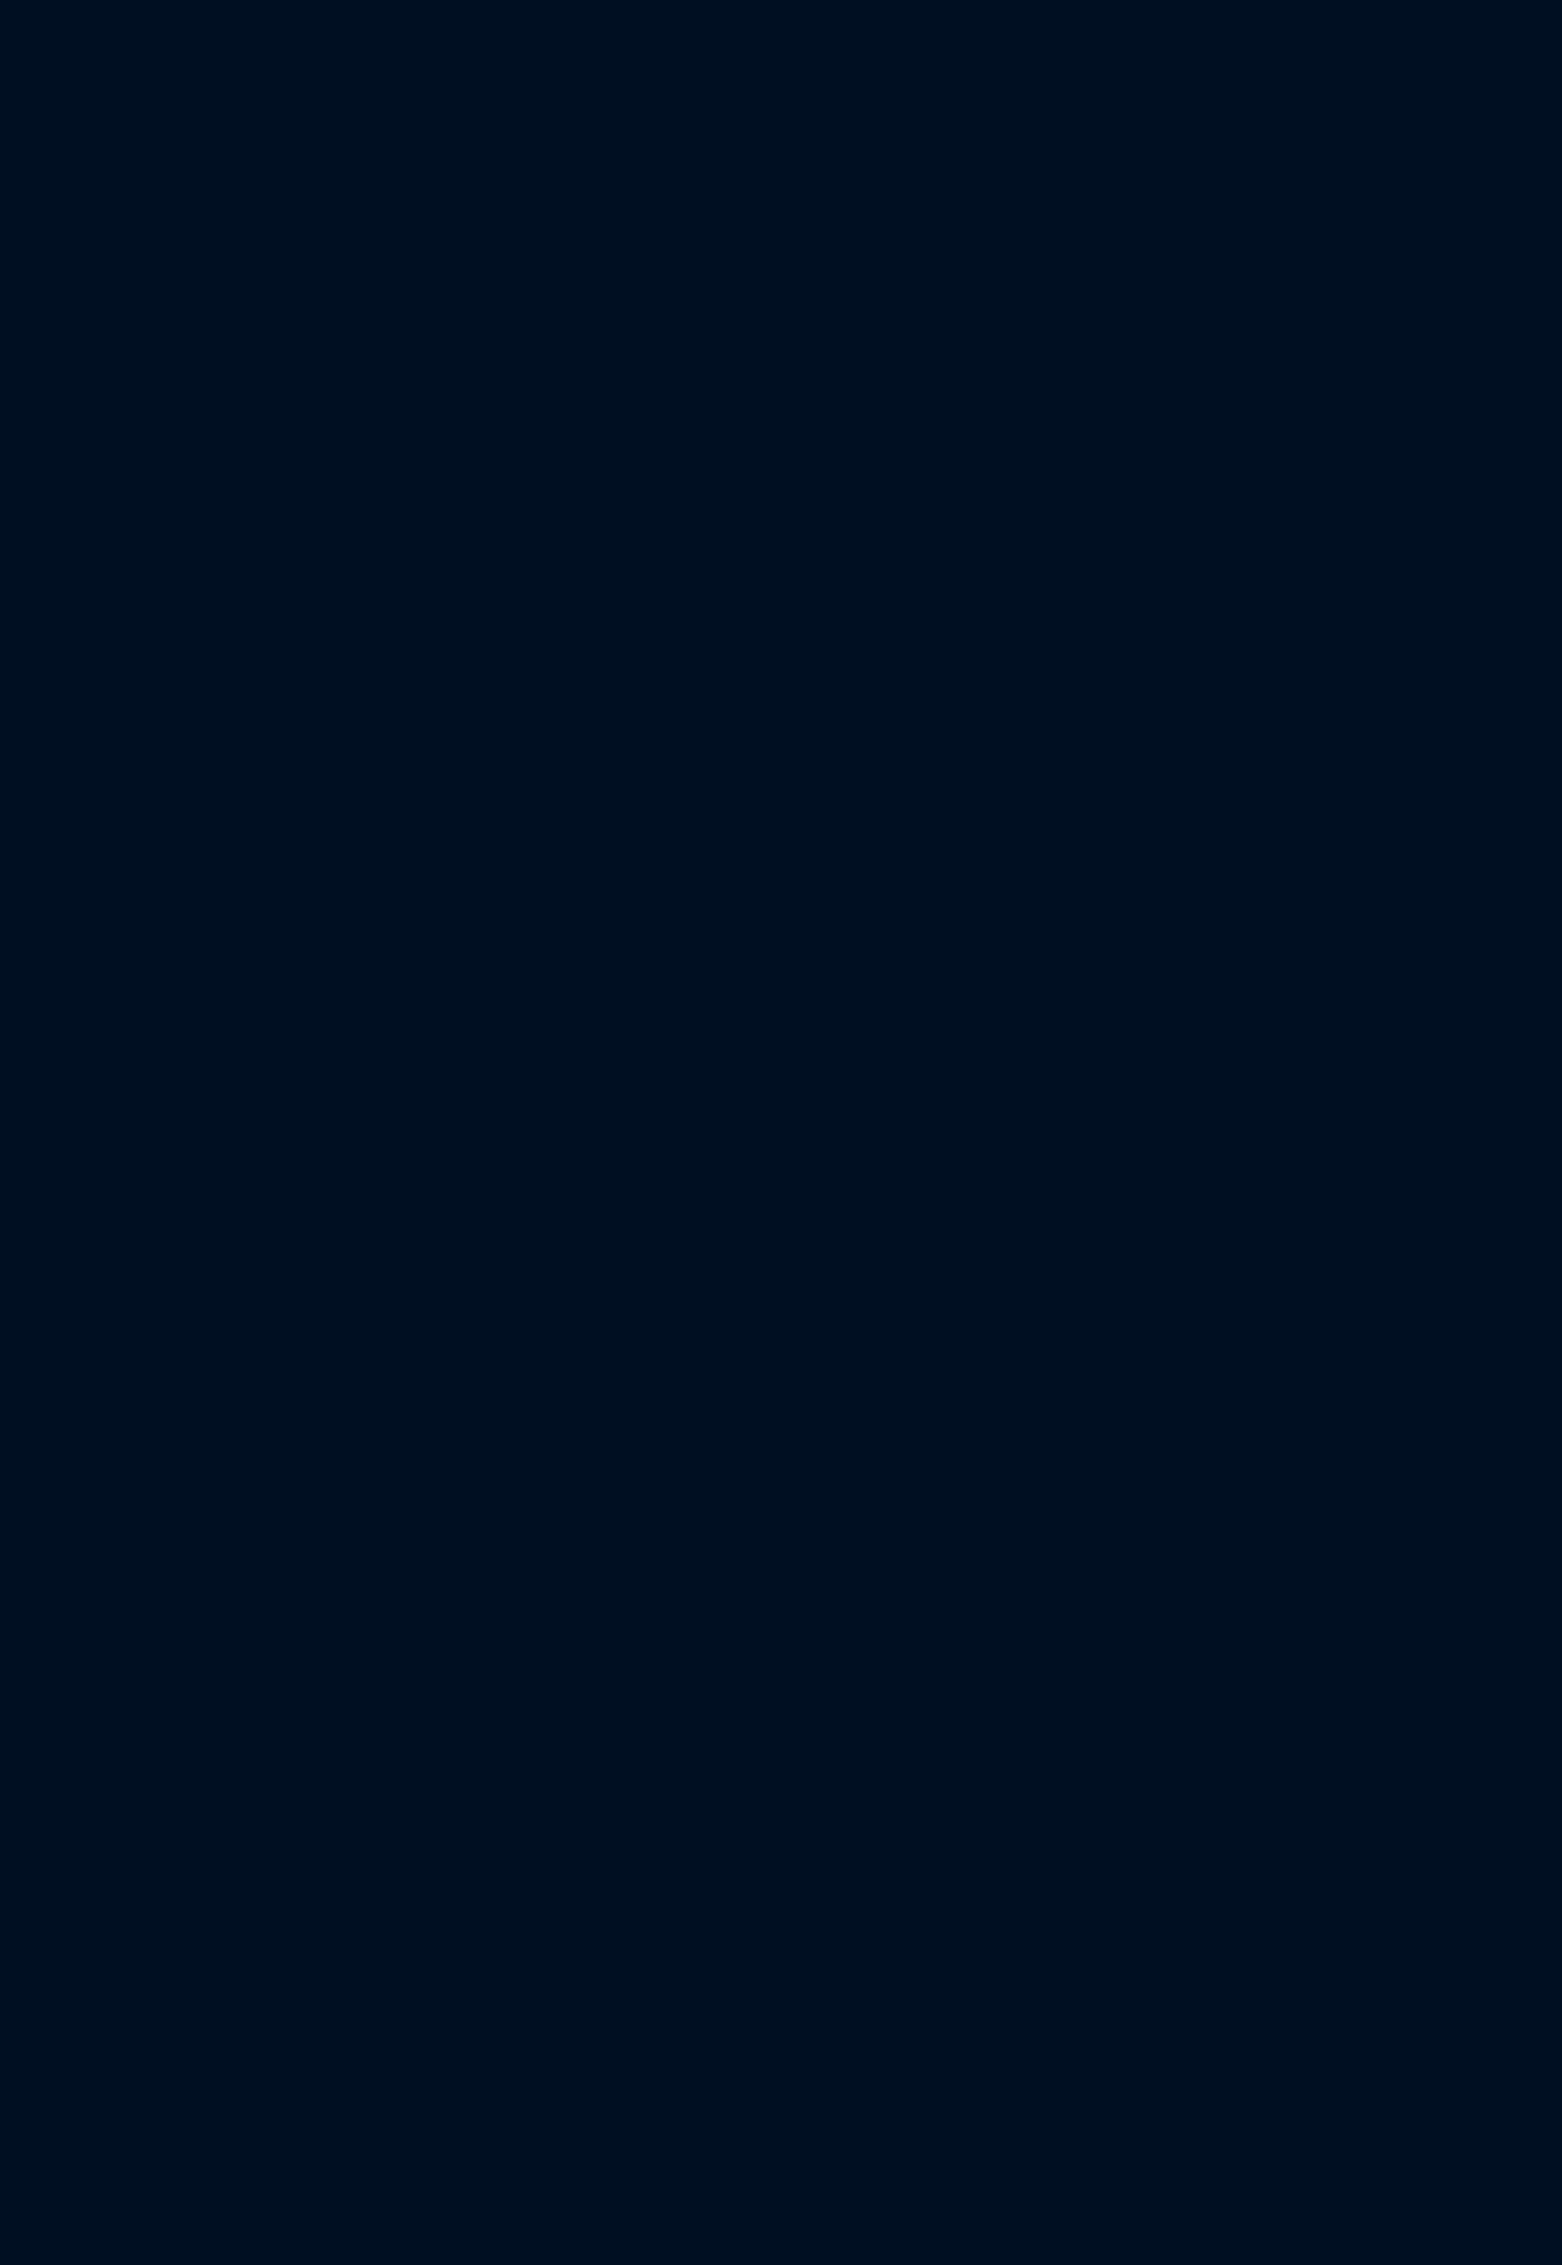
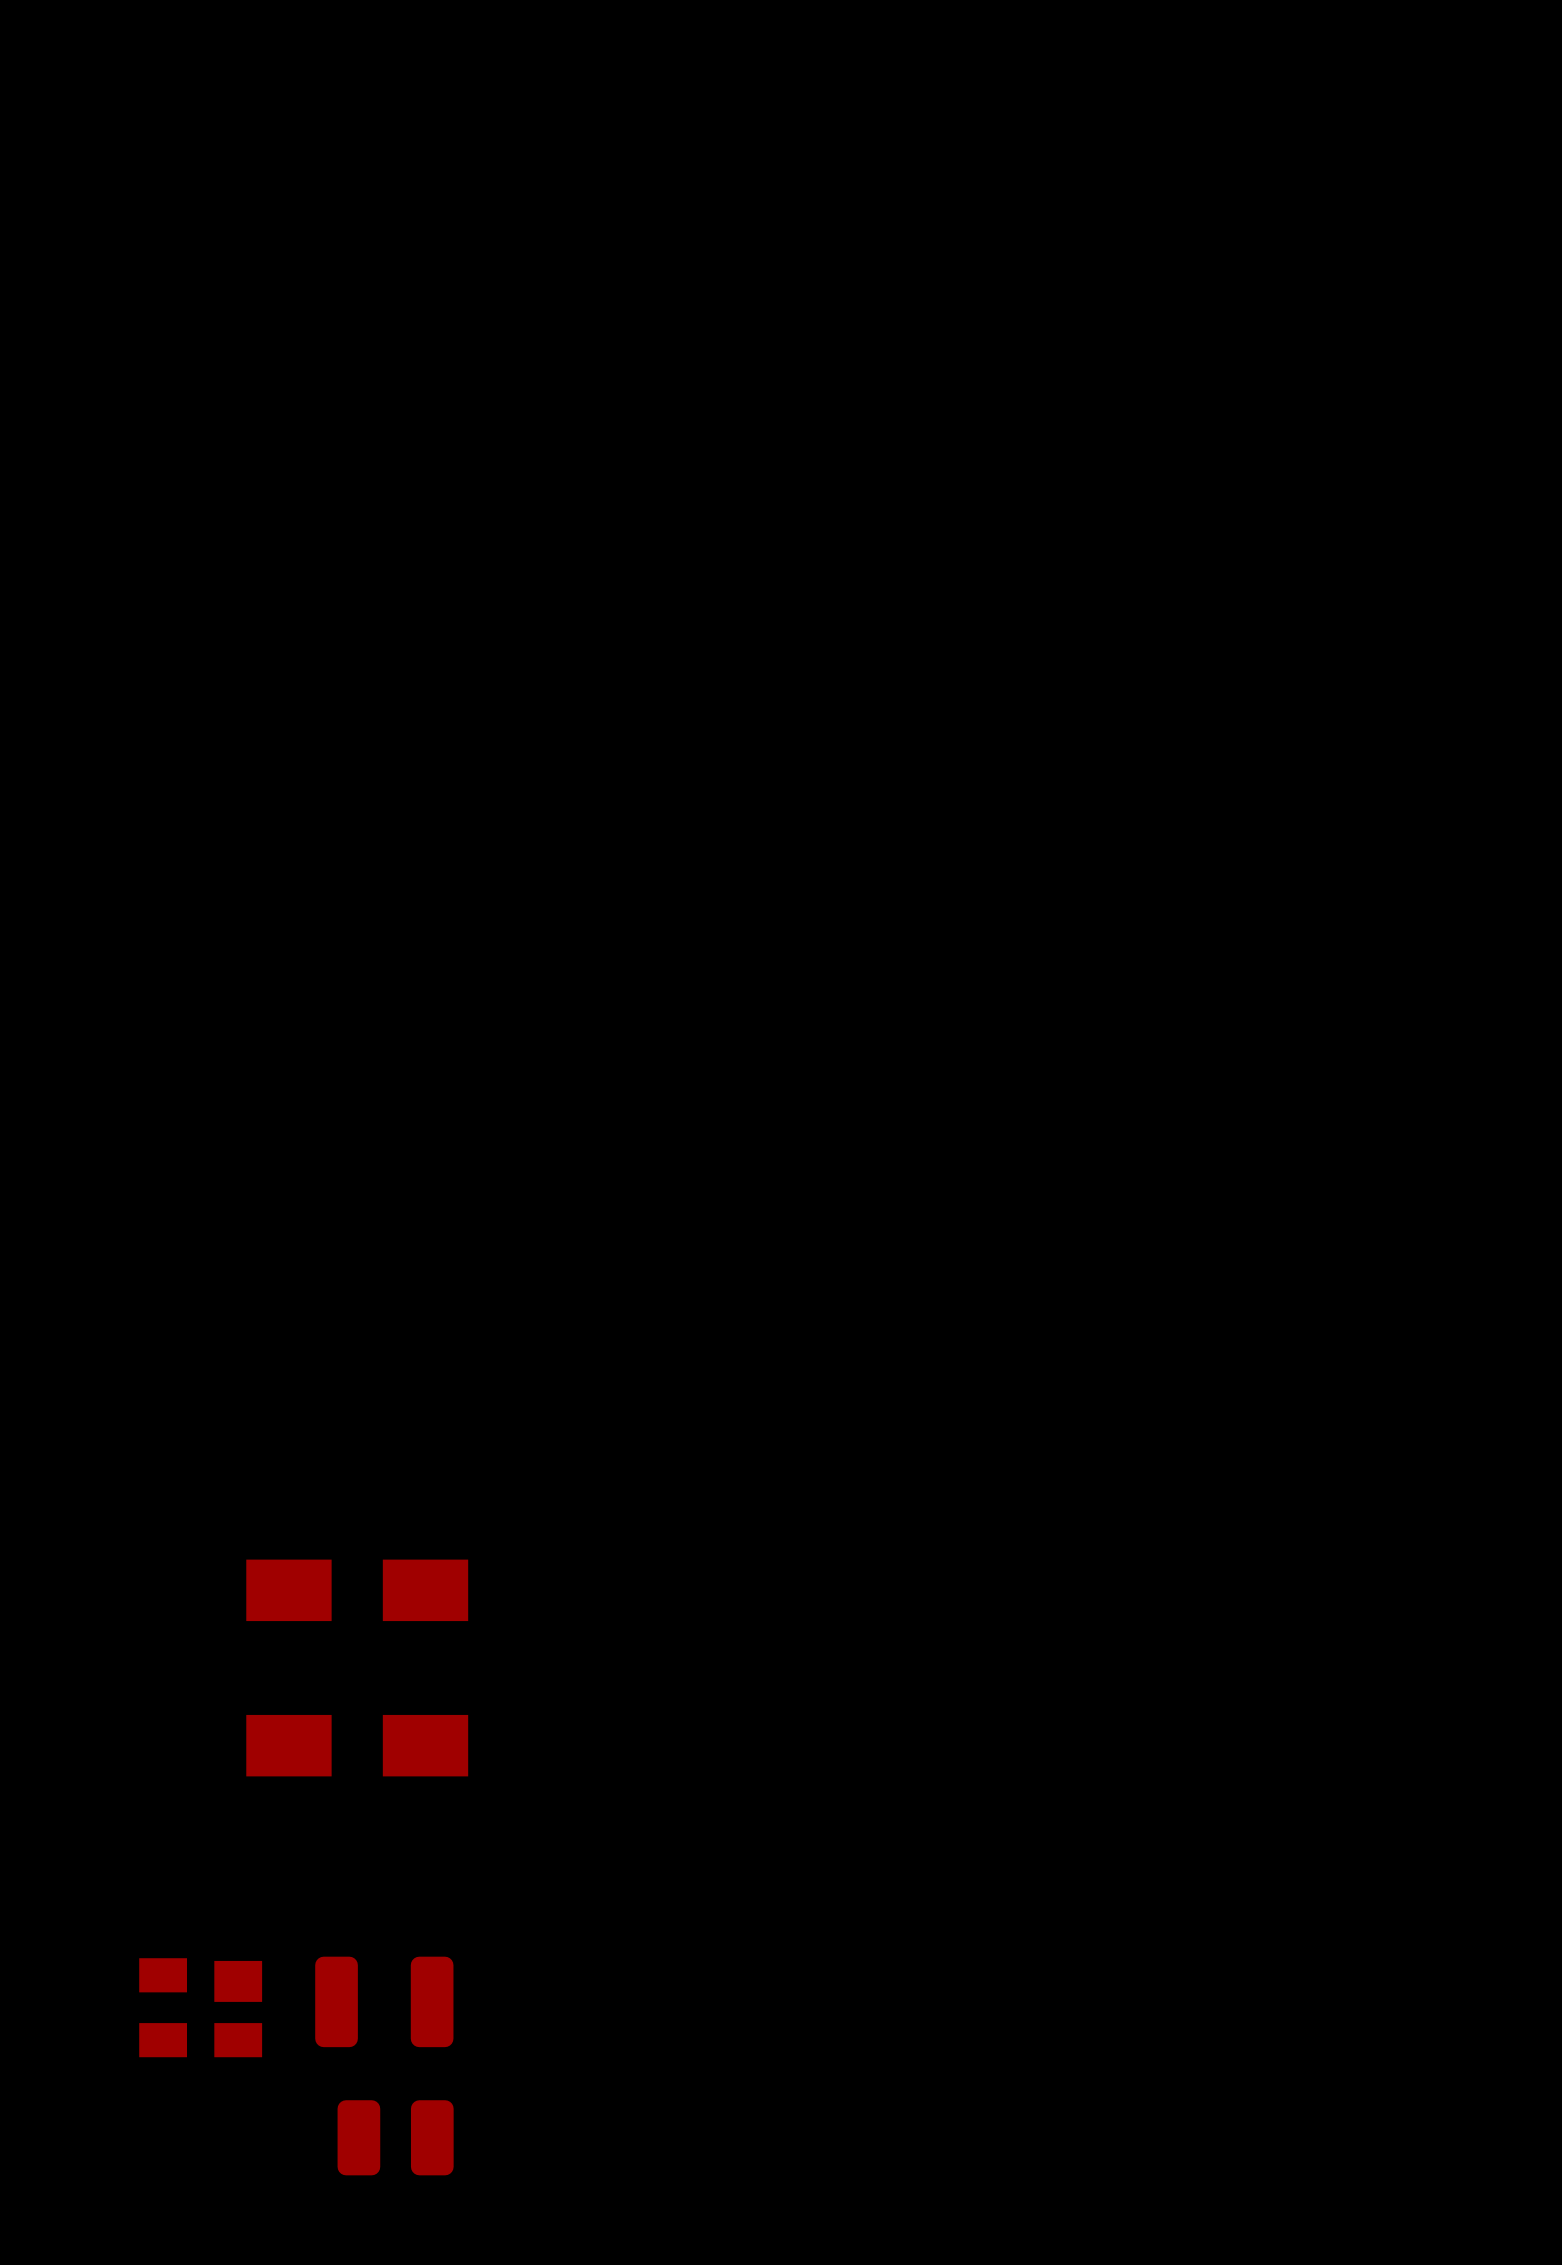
part: none -> (357, 1590)
part: none -> (357, 1745)
part: none -> (384, 2001)
part: none -> (200, 2007)
part: none -> (395, 2137)

